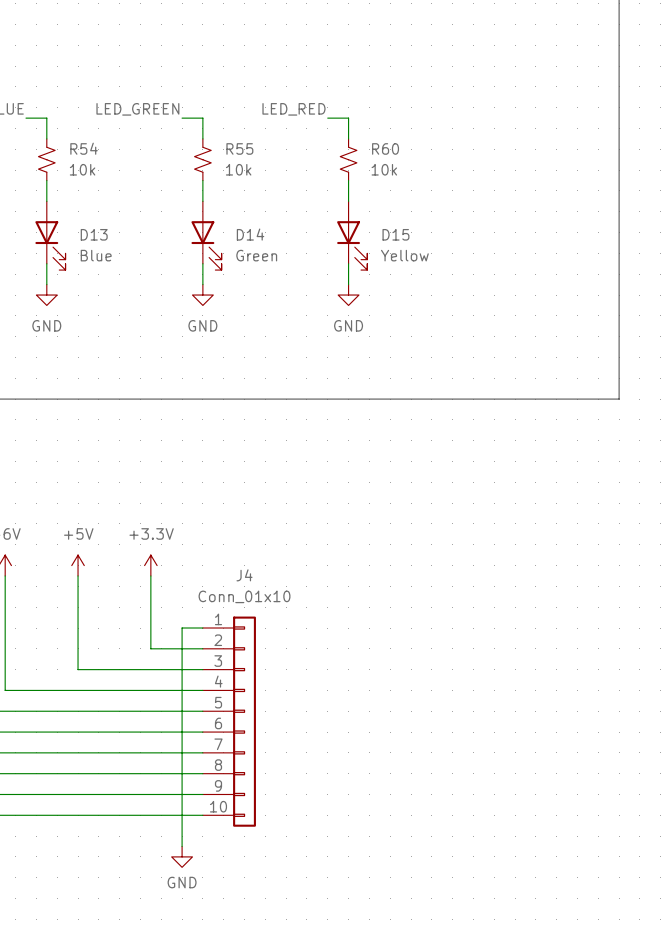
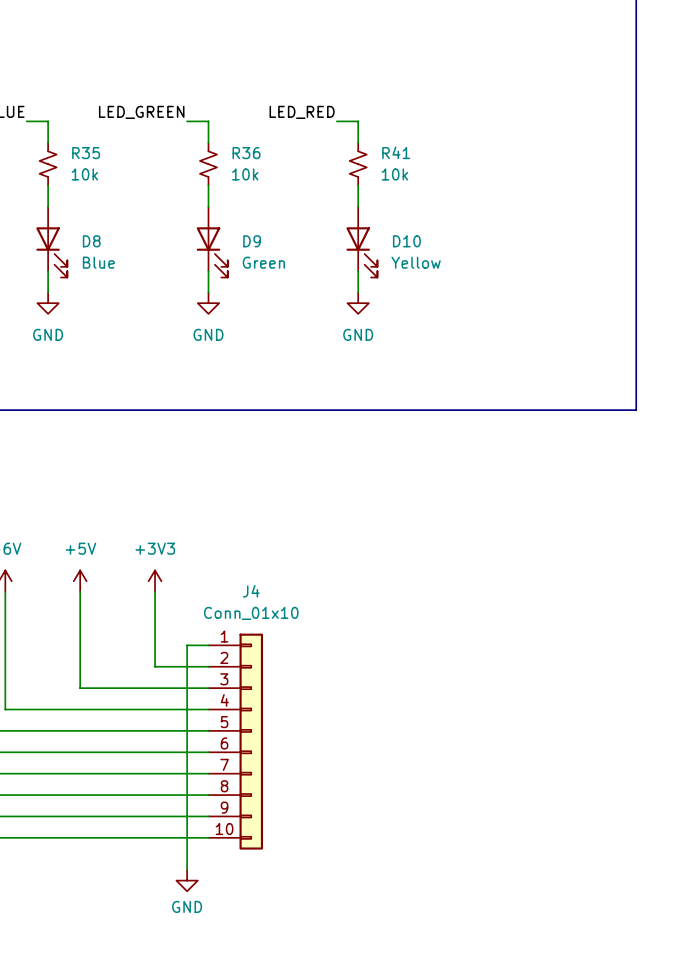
R54 name: R54 (84, 148) -> R35 (86, 153)
R55 name: R55 (239, 148) -> R36 (246, 153)
R60 name: R60 (385, 148) -> R41 (396, 152)
D13 name: D13 (94, 234) -> D8 (91, 241)
D14 name: D14 (250, 234) -> D9 (252, 241)
D15 name: D15 (395, 234) -> D10 (406, 241)
power symbol: +3.3V (150, 565) -> +3V3 (155, 581)

